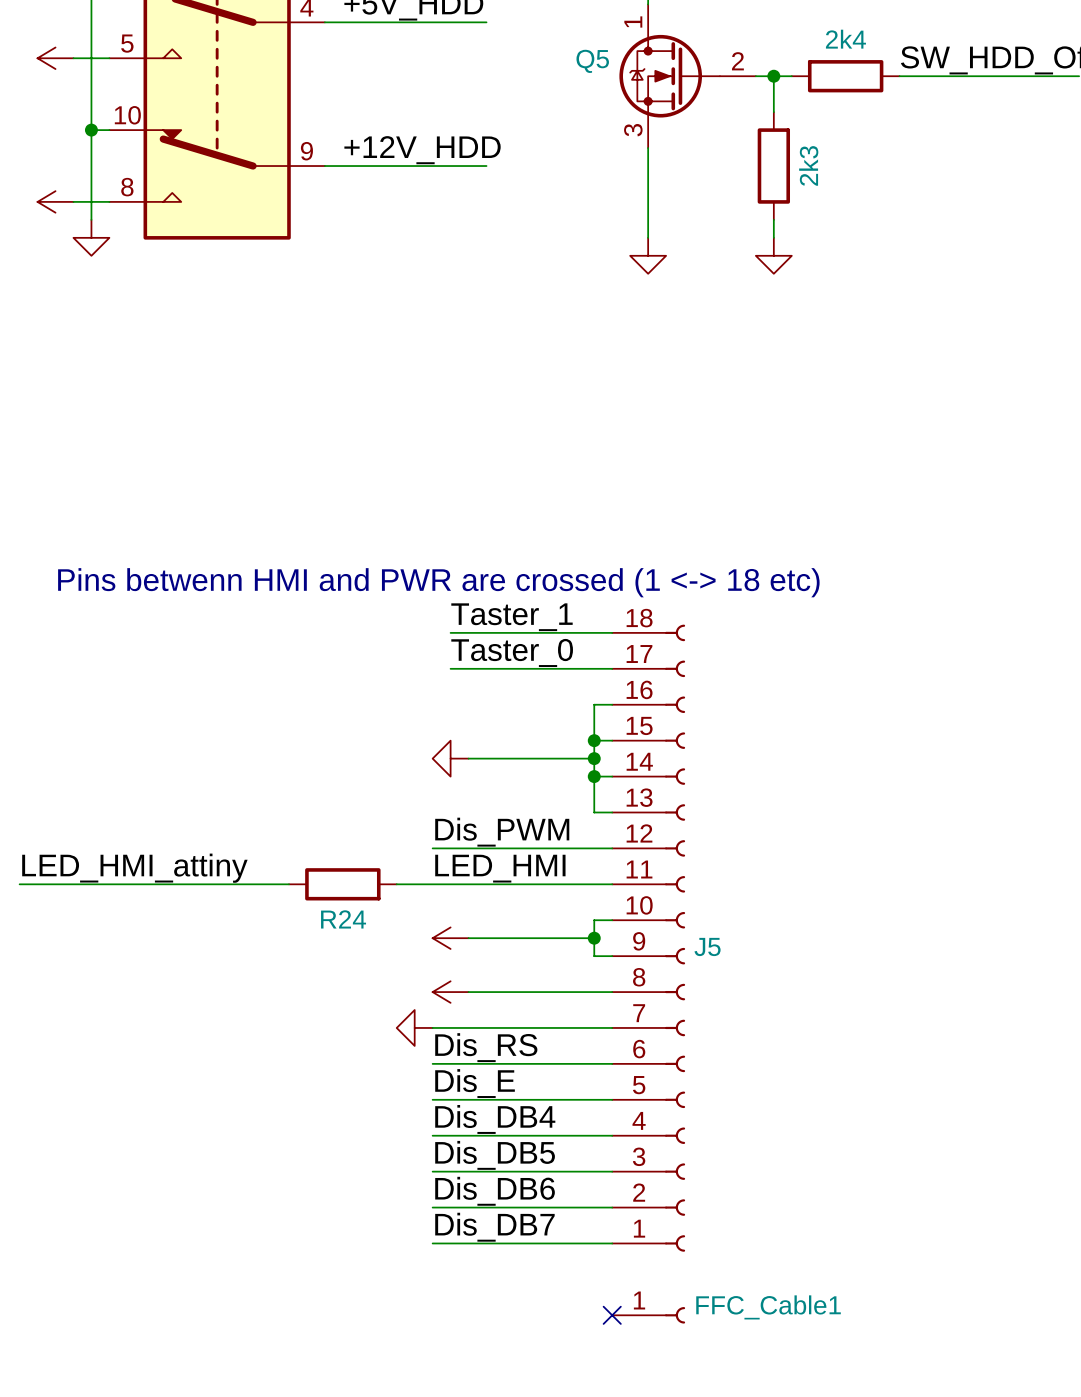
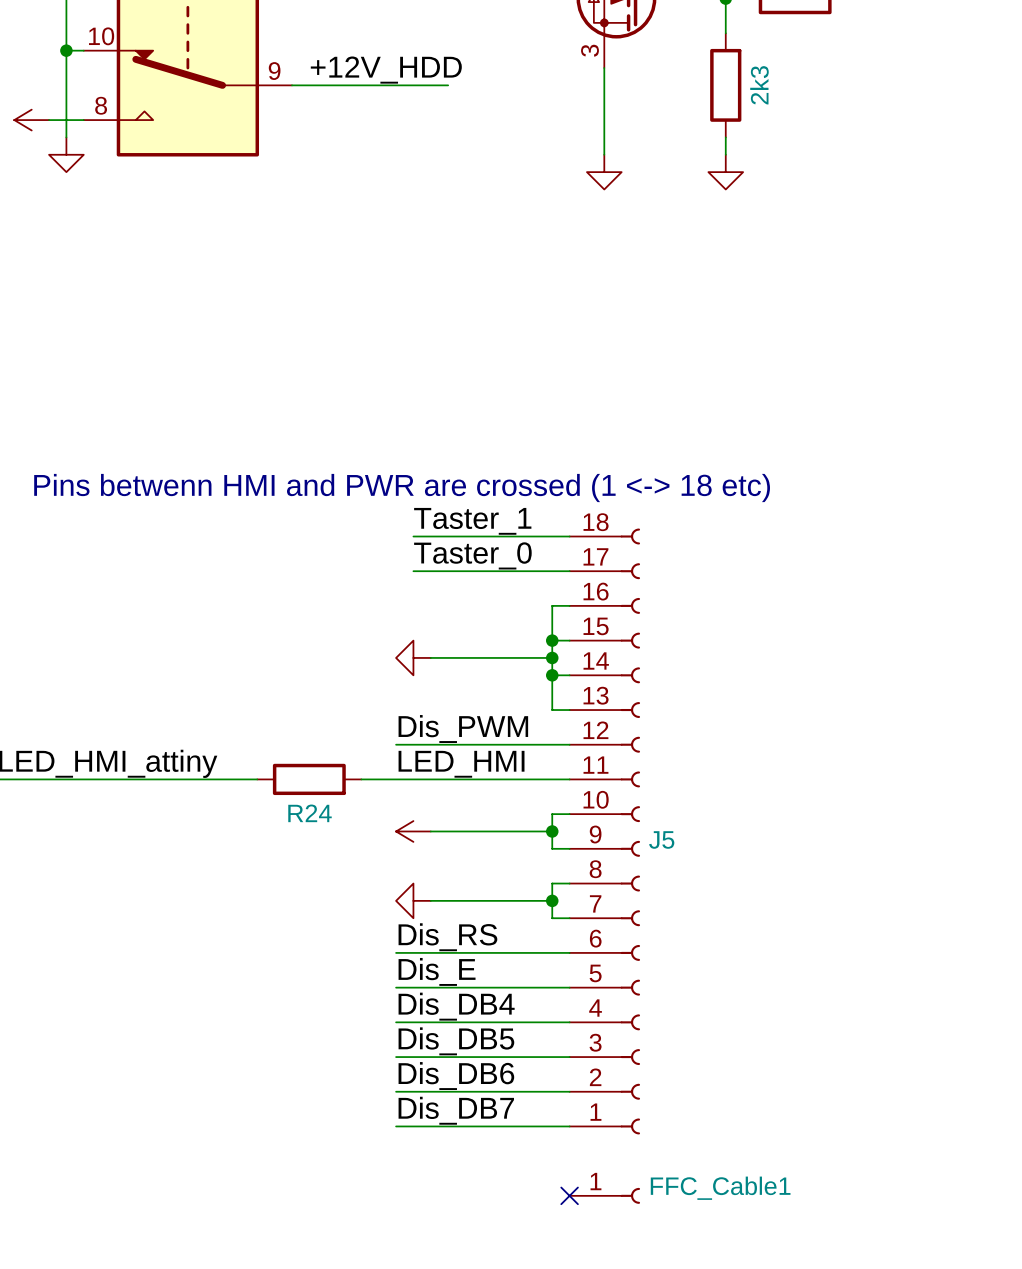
power symbol: (450, 992) -> none
wire: (468, 992) (594, 992) -> (552, 918) (552, 883)
wire: none -> (430, 900) (552, 900)
junction: none -> (552, 900)
power symbol position: (414, 1027) -> (413, 900)
wire: (432, 1027) (594, 1027) -> none

